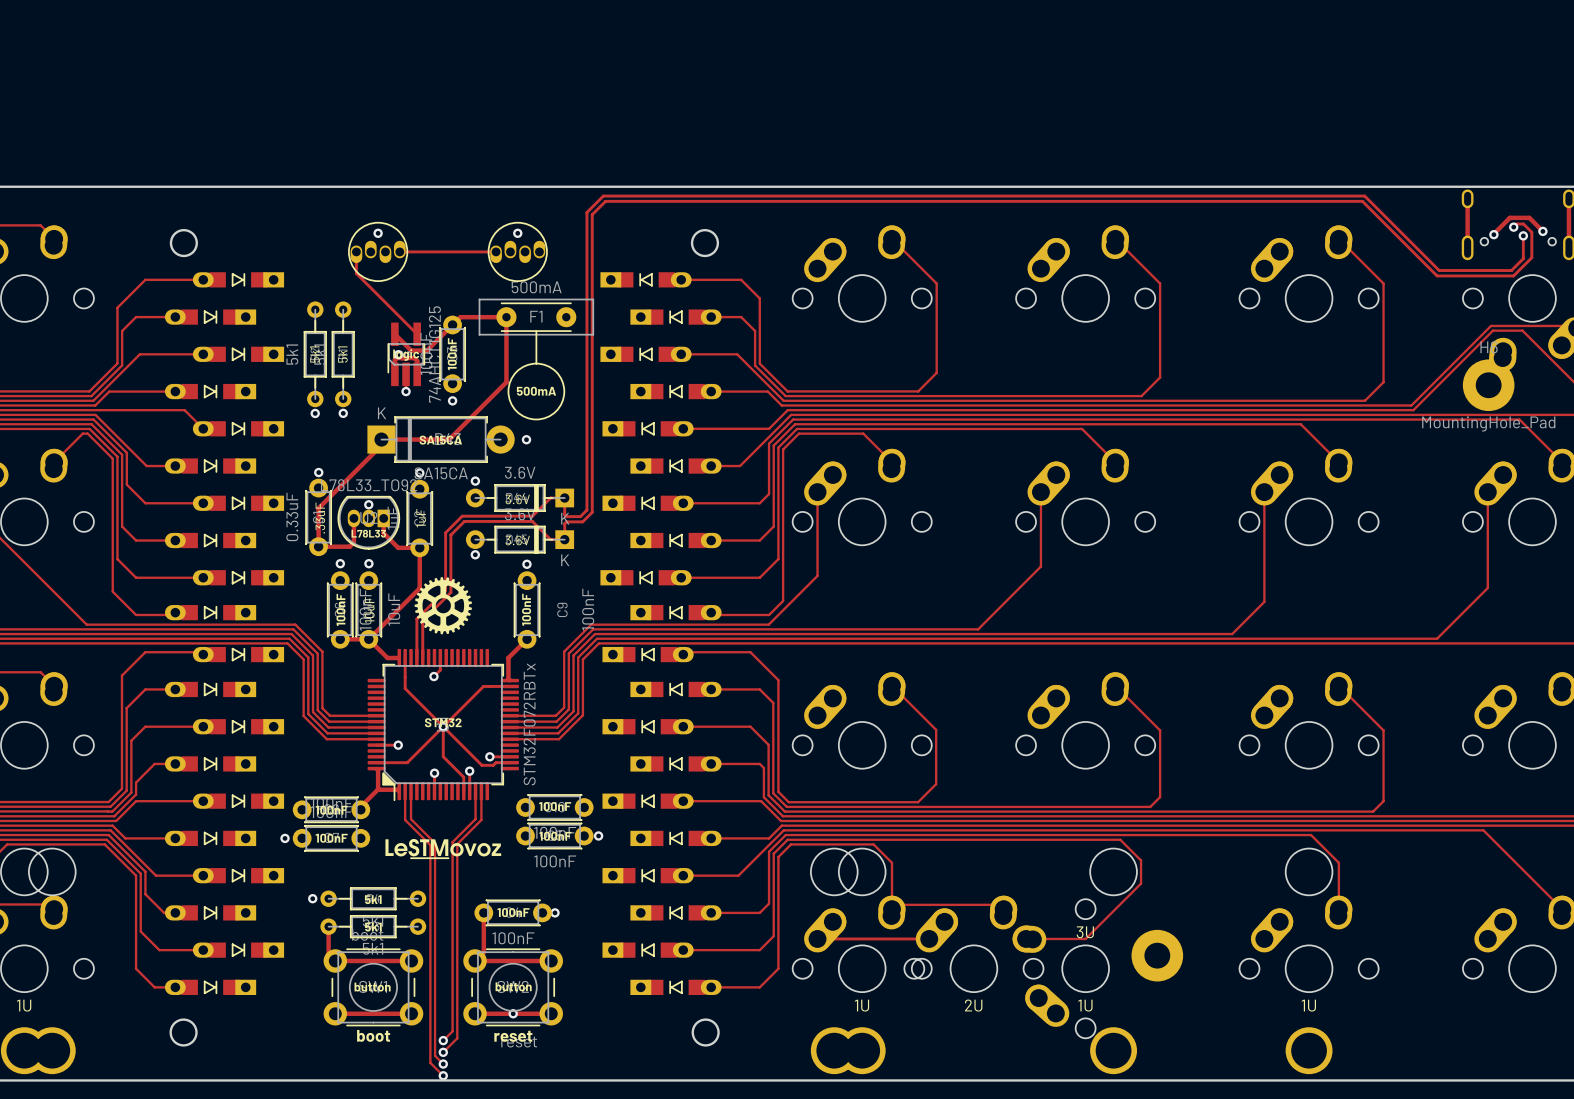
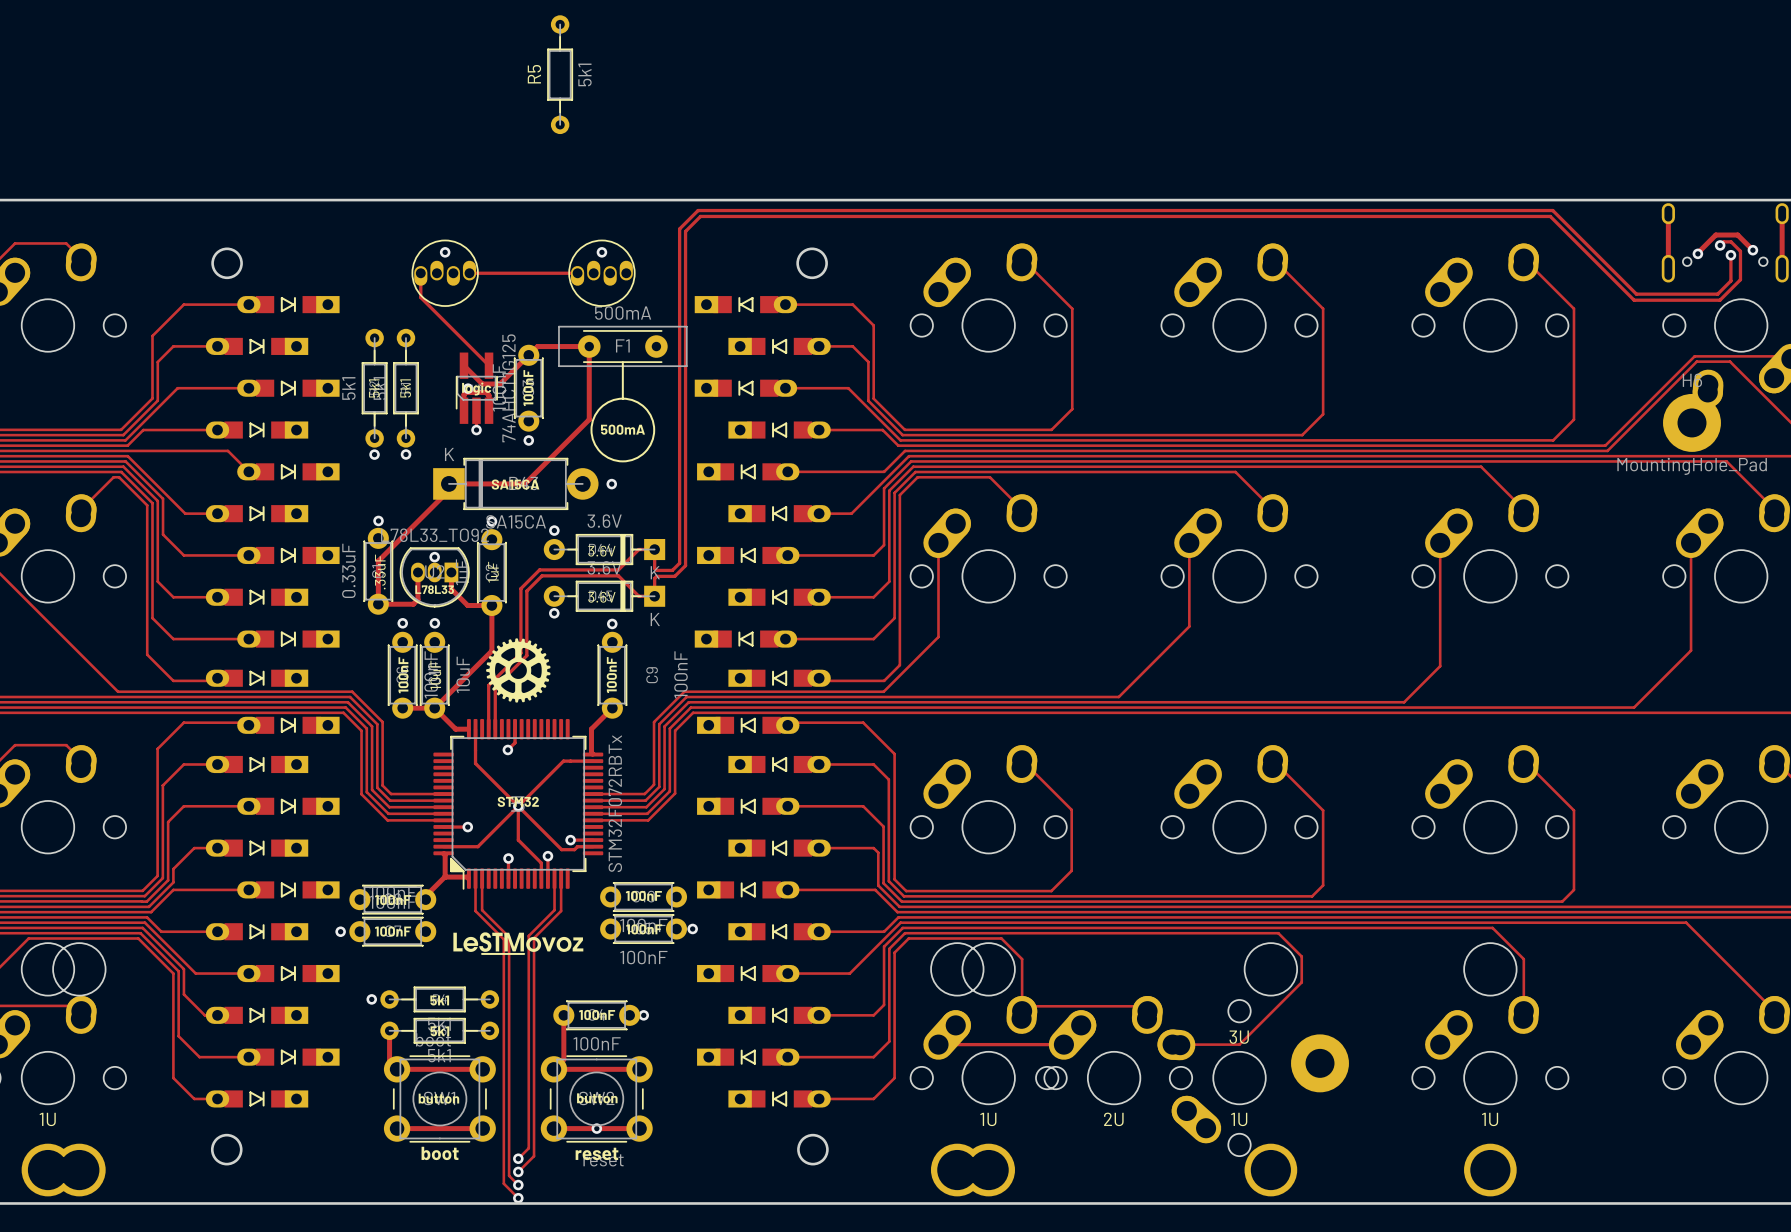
R5: none -> 5k1 (560, 74)

